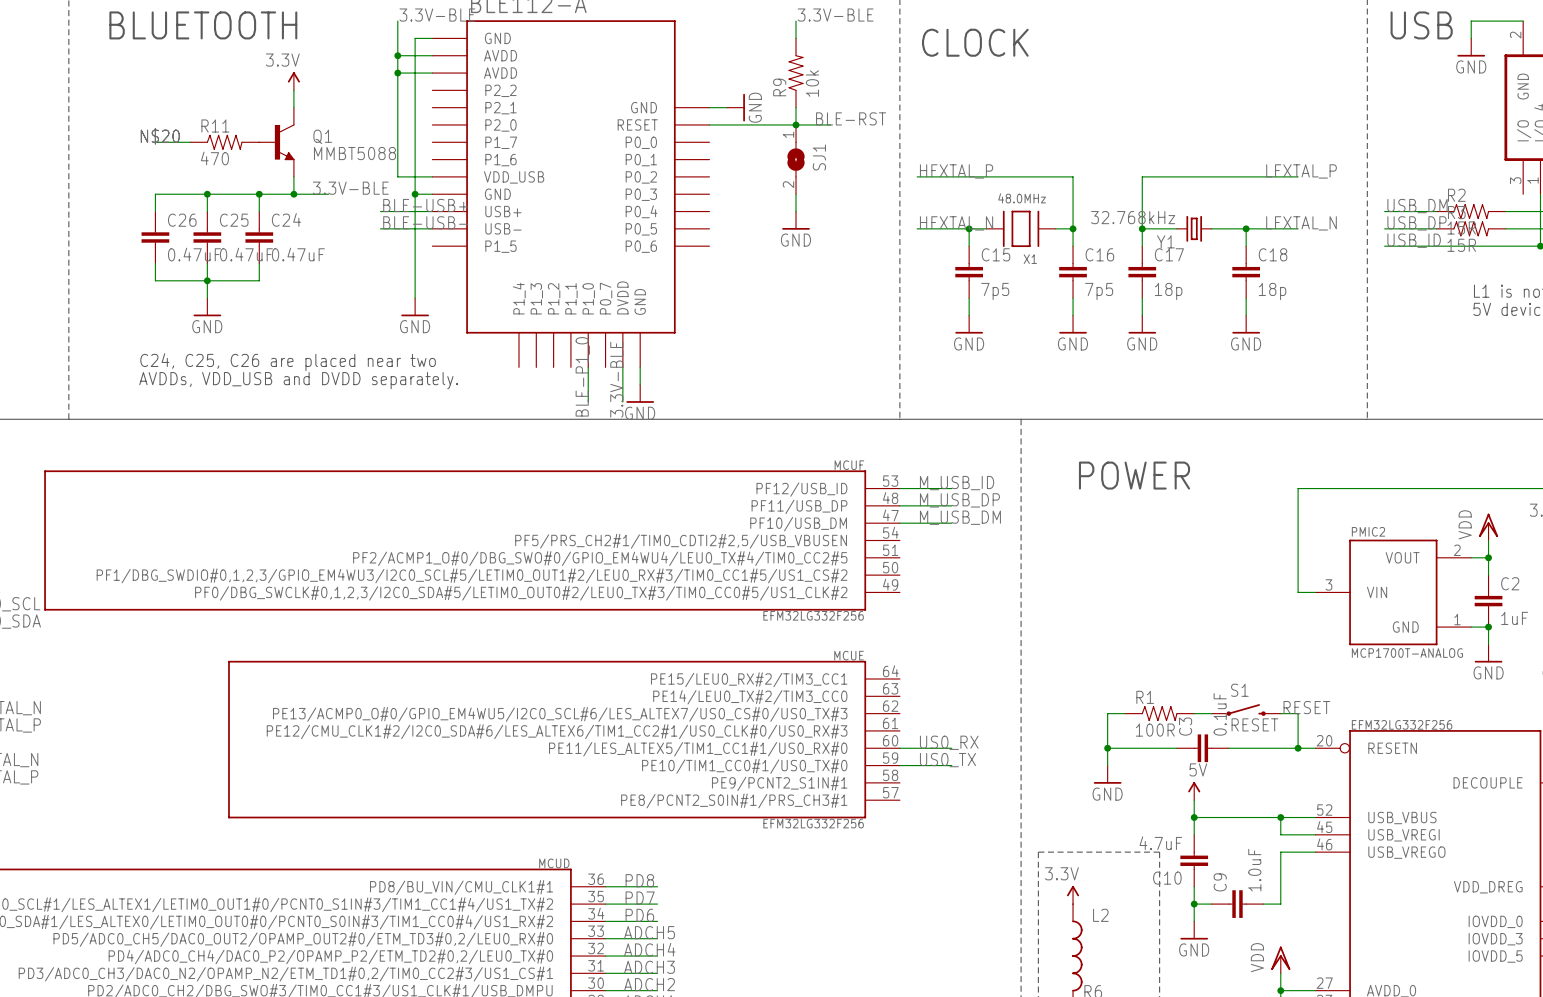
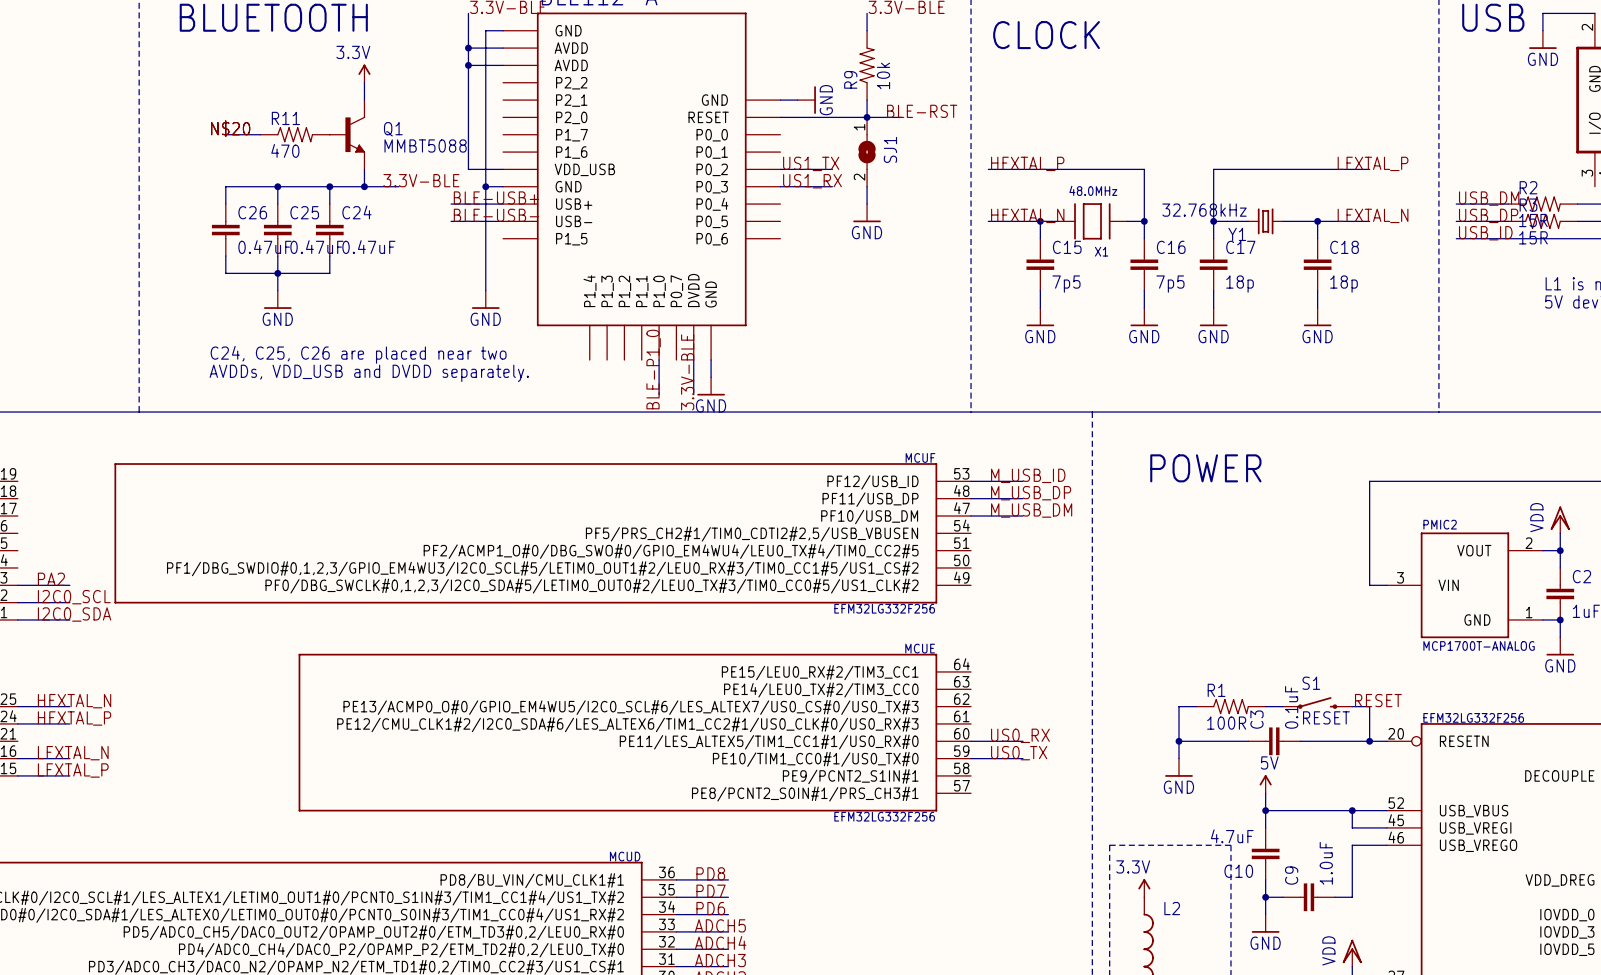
label: none -> US1_TX (811, 163)
wire: none -> (780, 169) (832, 169)
label: none -> US1_RX (812, 181)
wire: none -> (780, 186) (832, 186)

